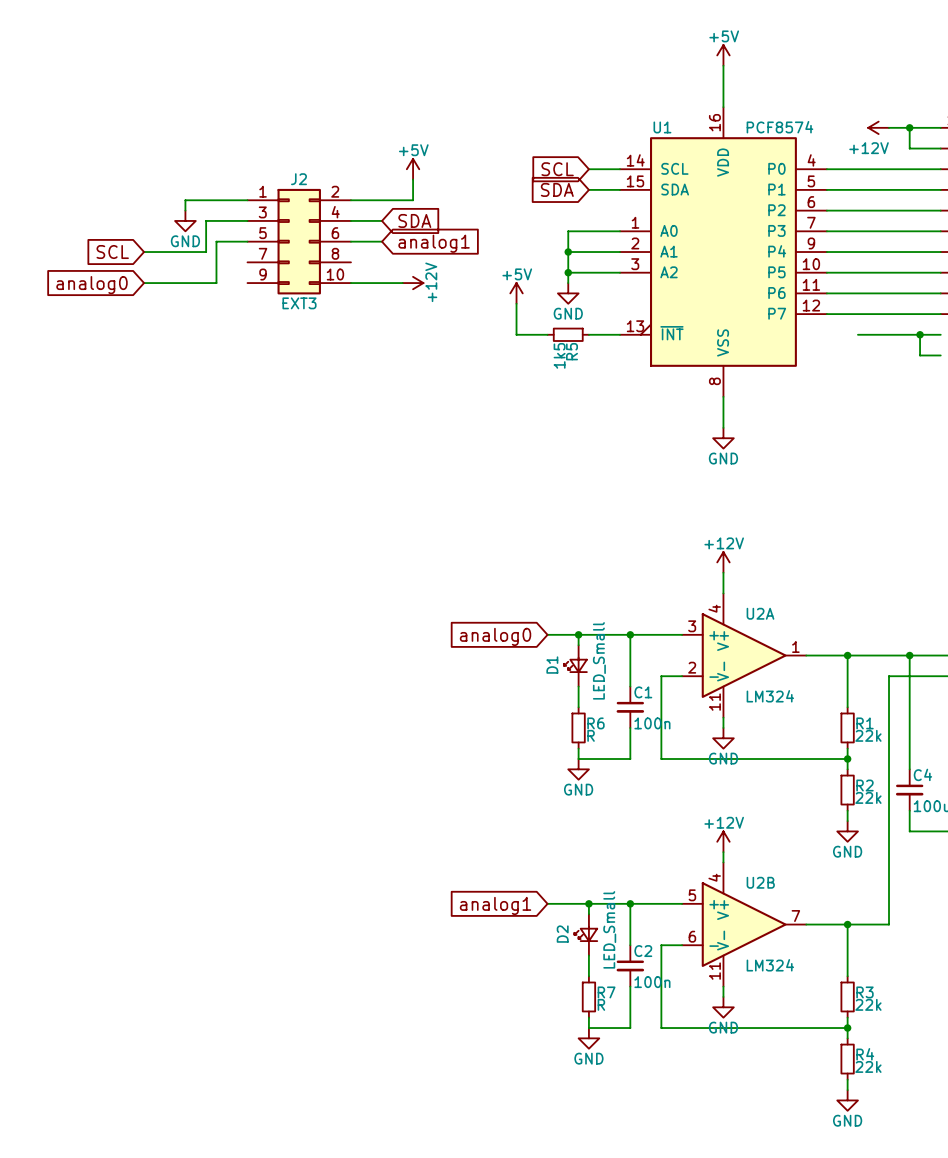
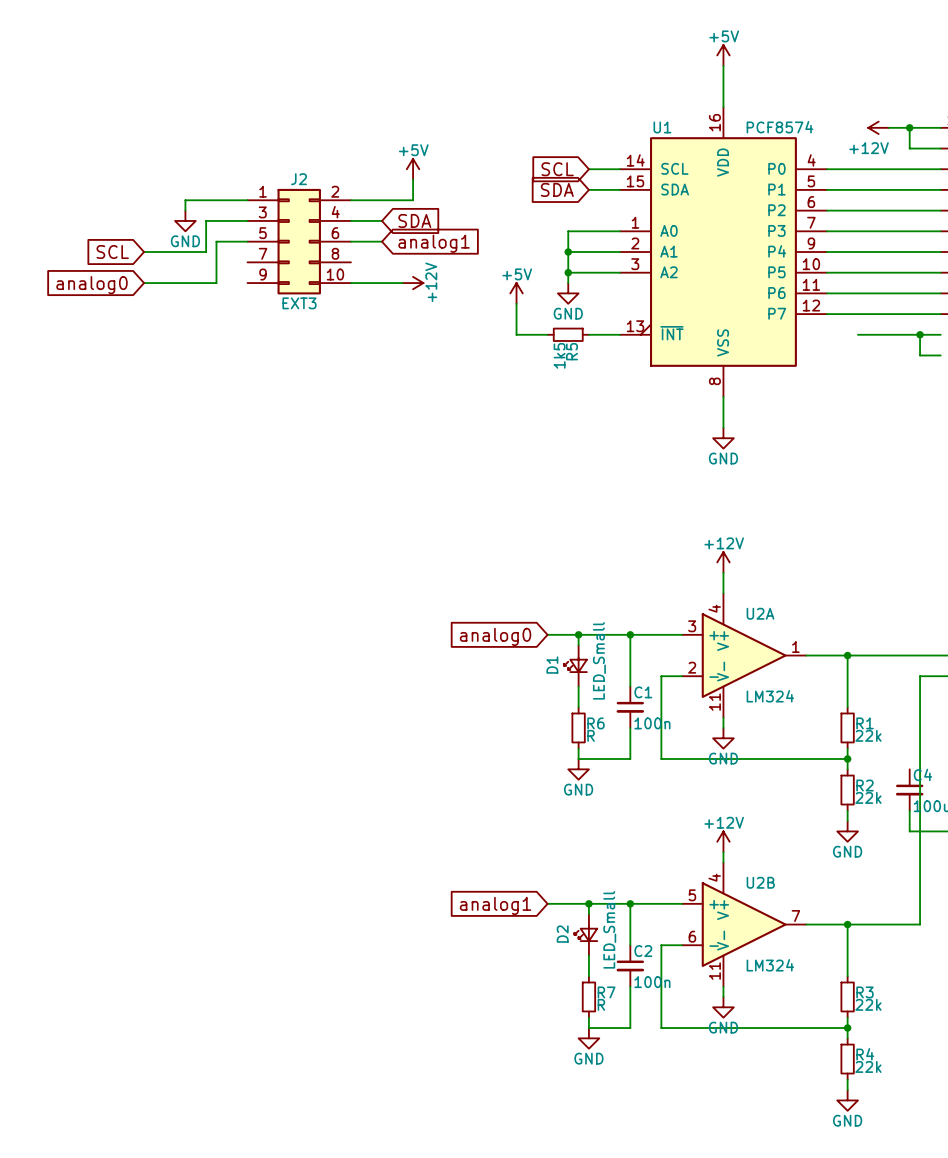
wire: (909, 655) (909, 769) -> none
junction: (909, 655) -> none
wire: (920, 676) (889, 676) (889, 924) -> (920, 676) (920, 924) (889, 924)

